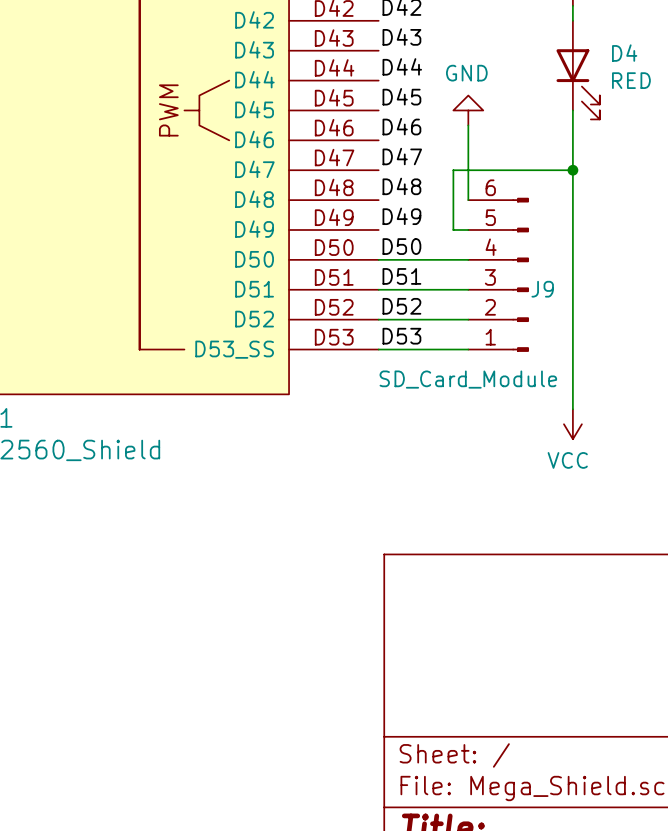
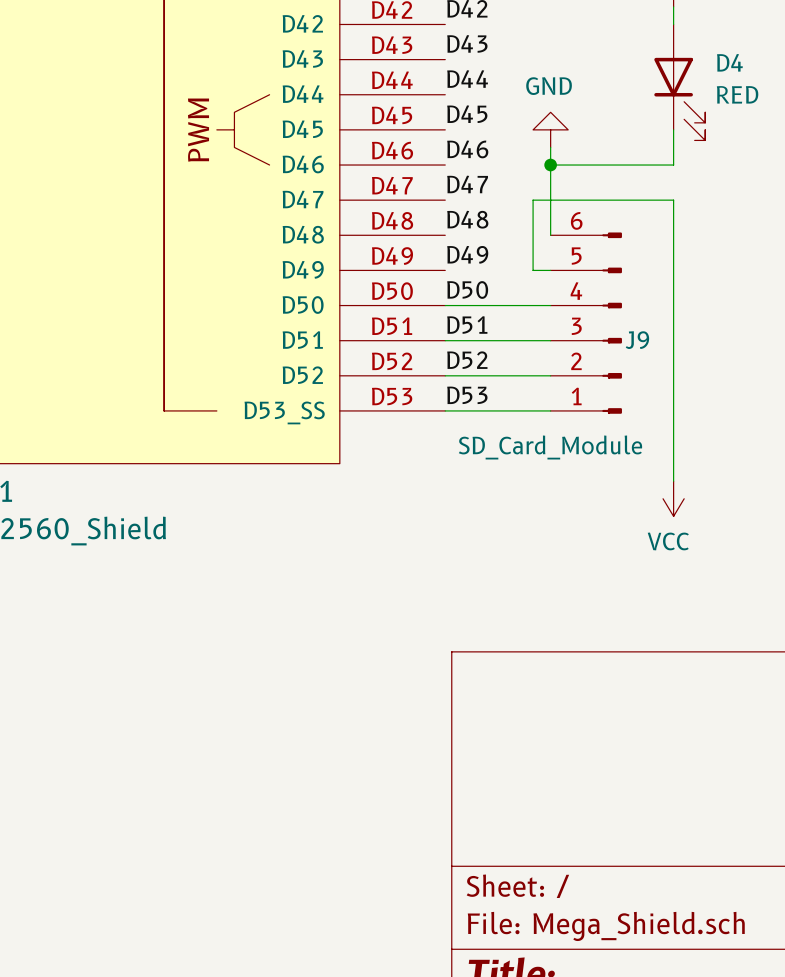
junction: none -> (550, 165)
wire: (572, 140) (572, 170) -> (673, 165) (550, 165)
junction: (572, 170) -> none

